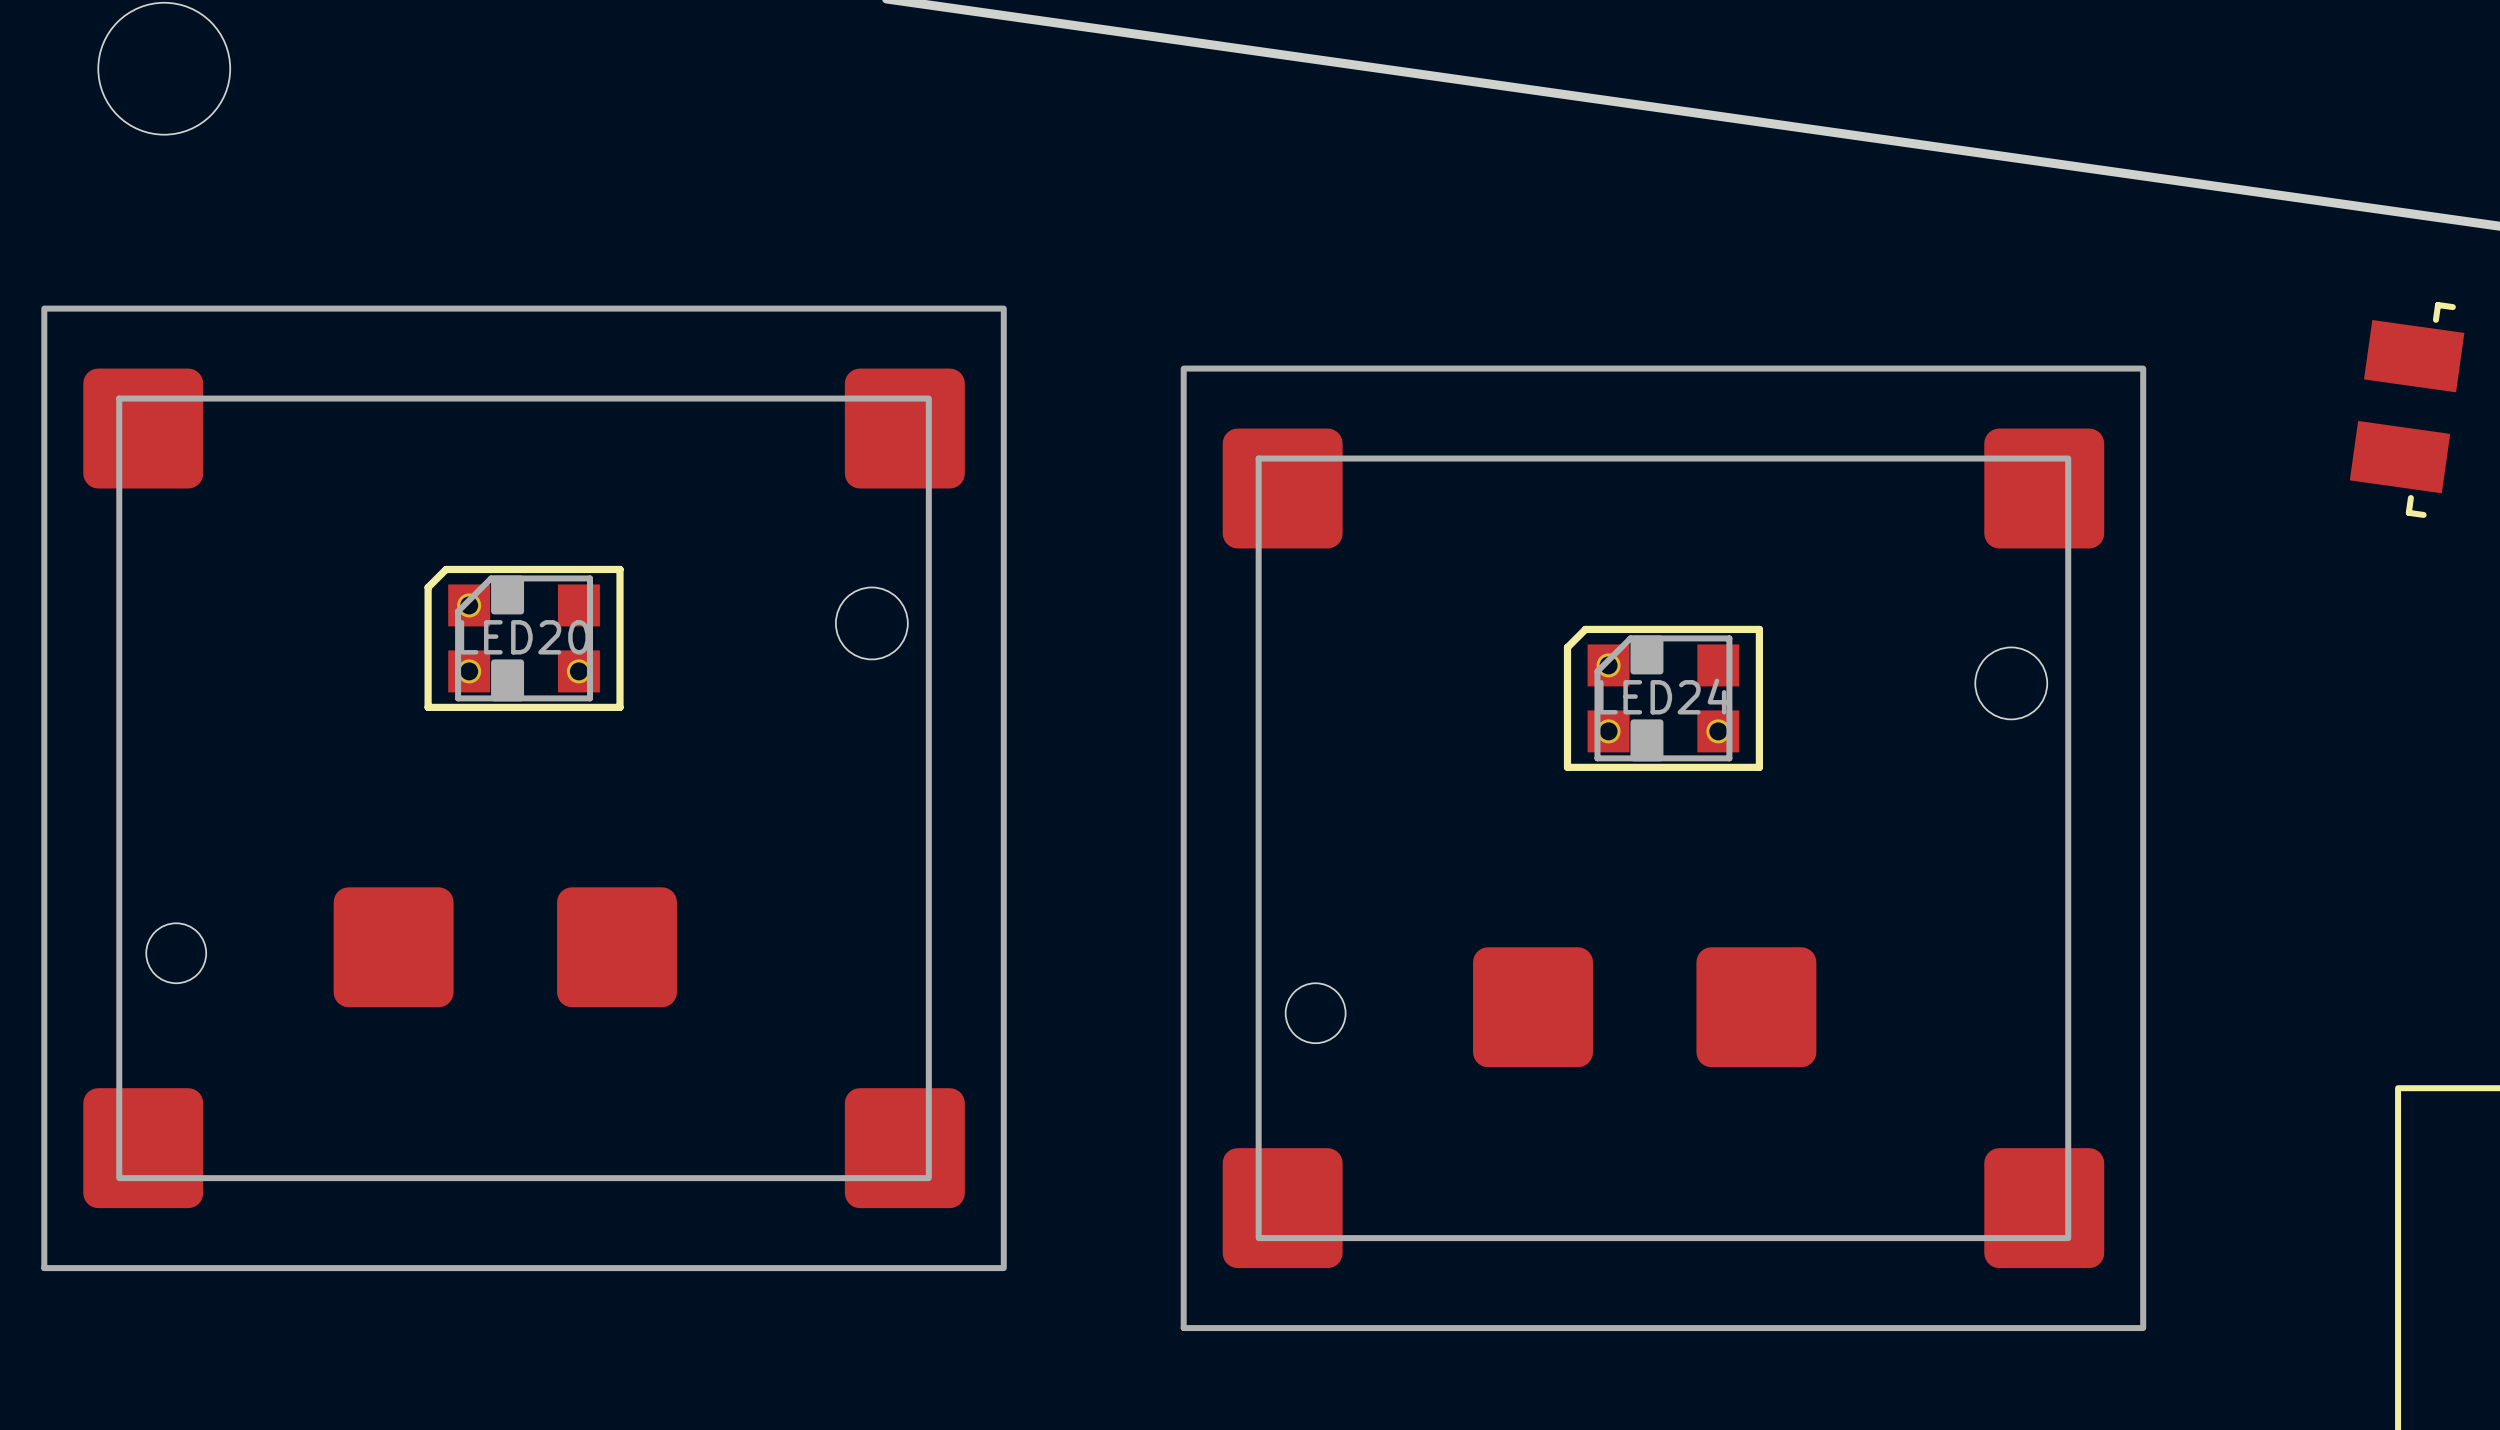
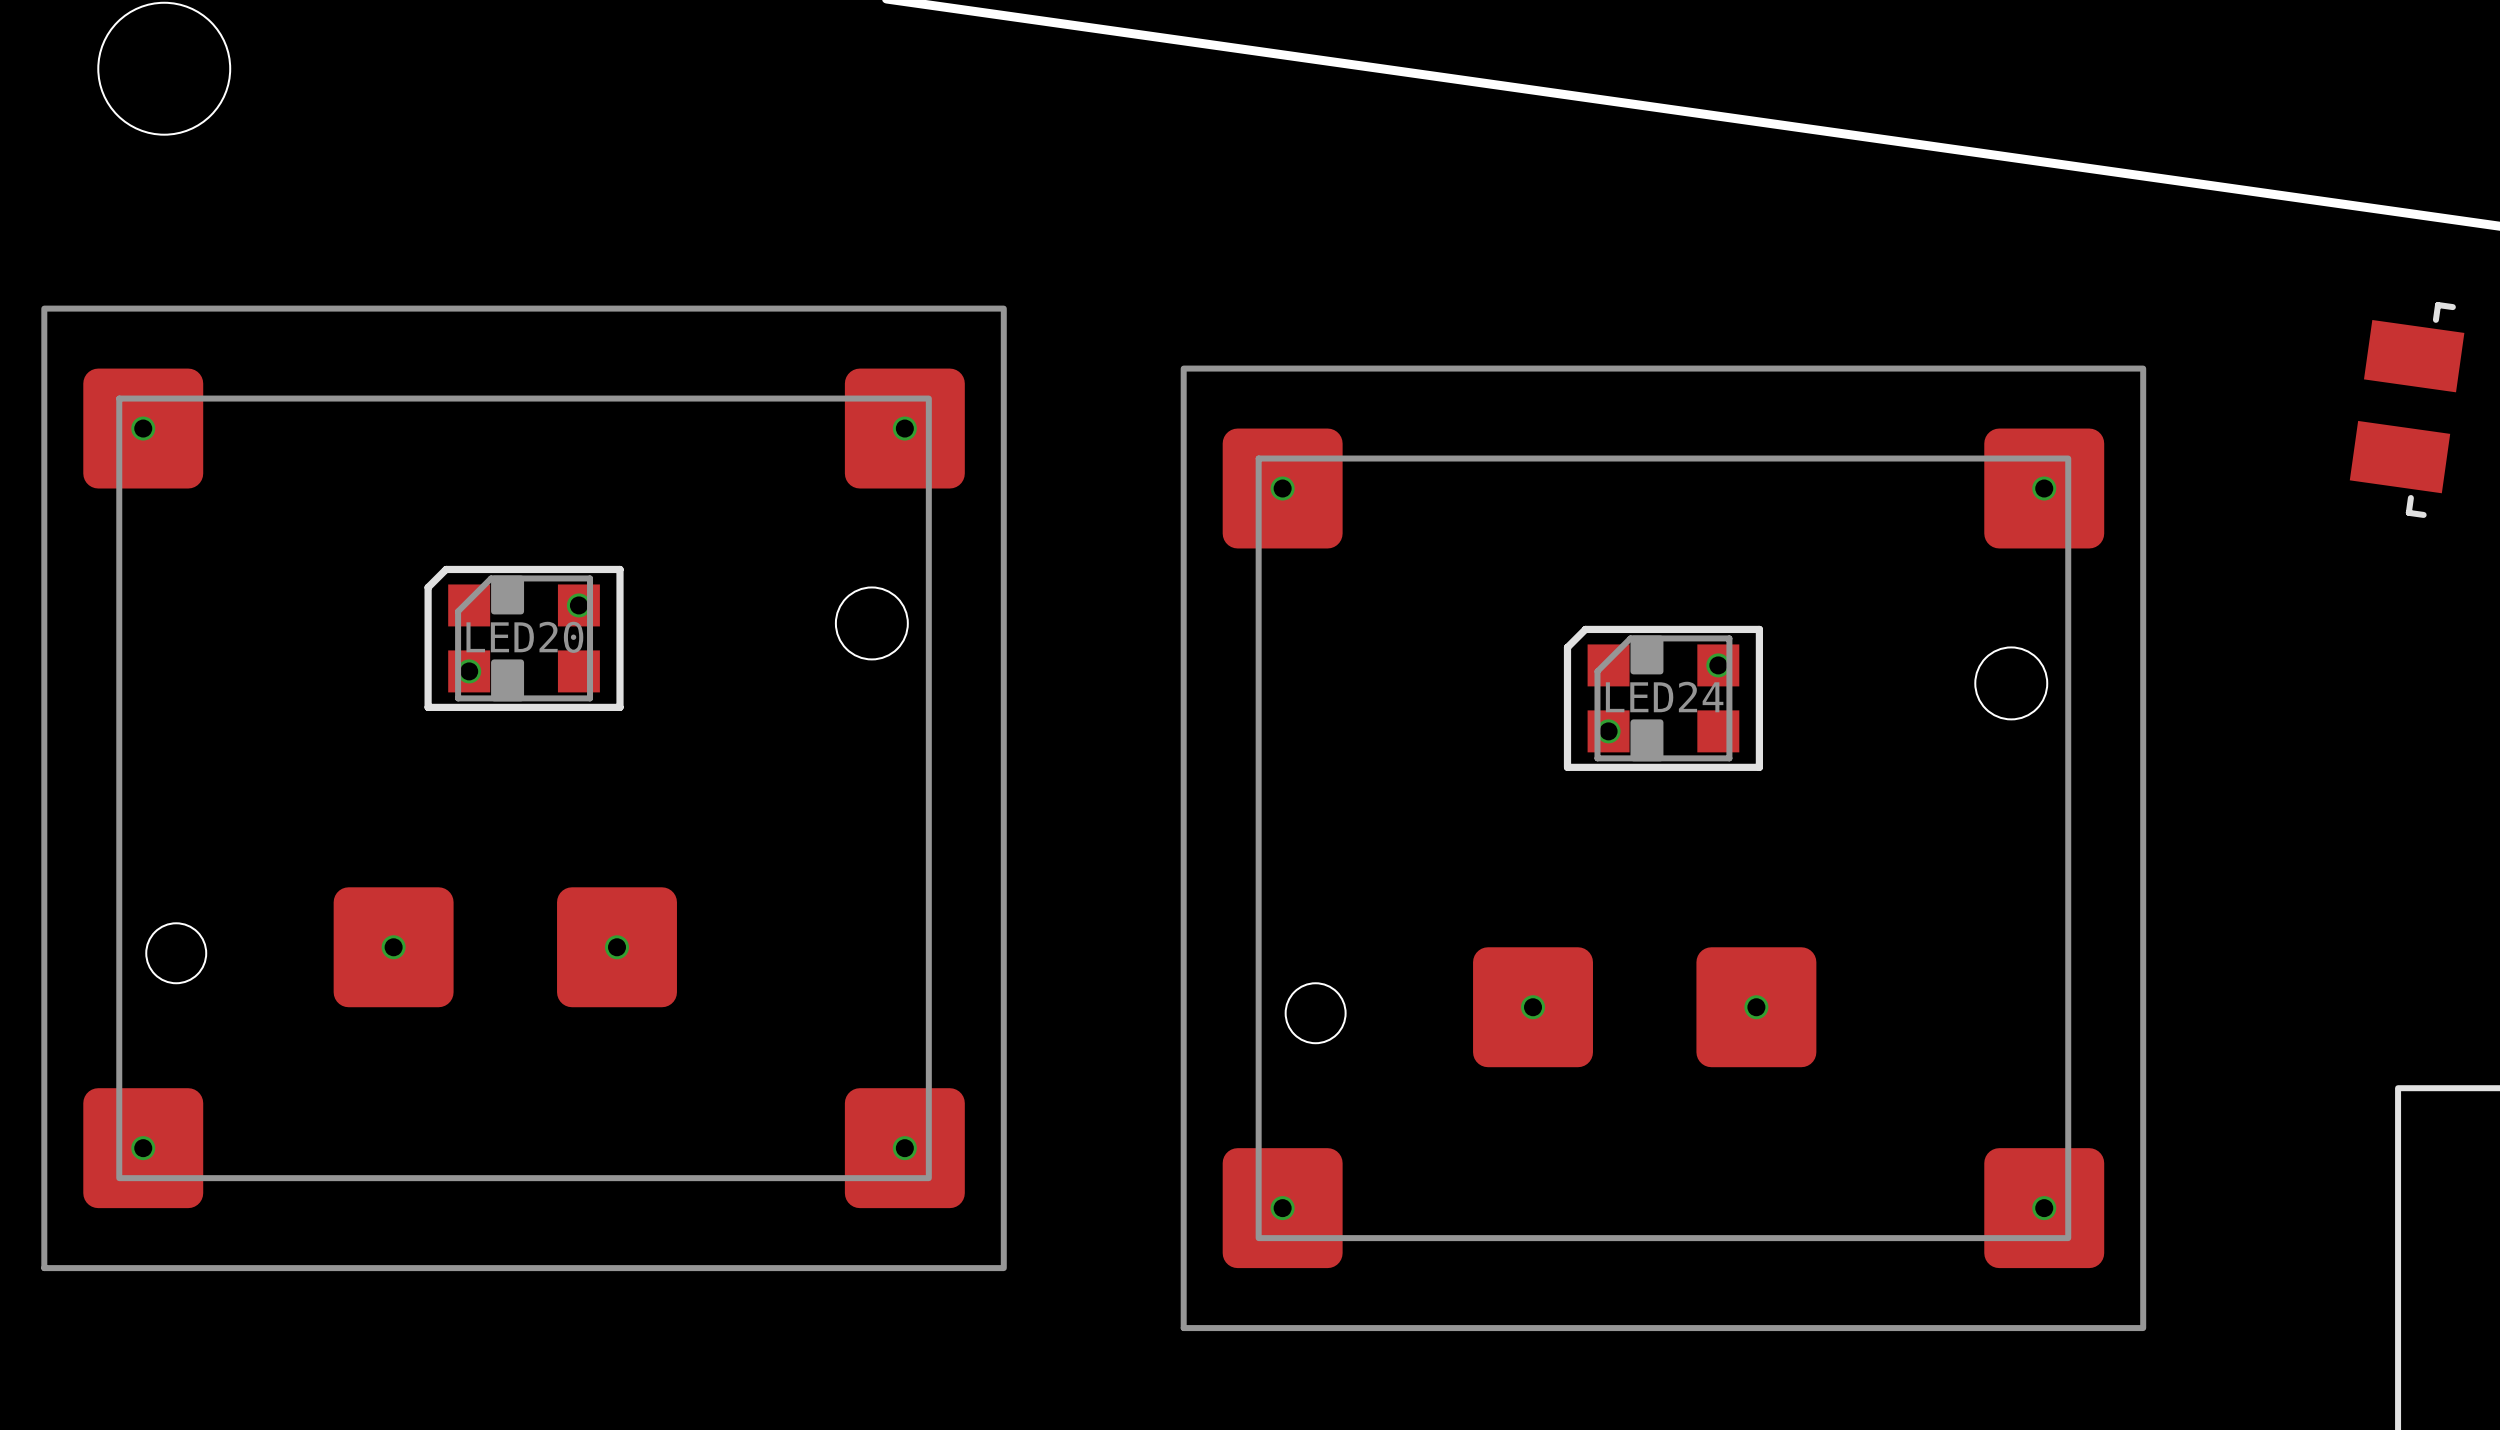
part footprint: [41, 305, 1007, 1272] -> [41, 305, 1007, 1272]
part footprint: [1180, 365, 2147, 1332] -> [1180, 365, 2147, 1332]
LED20 footprint: [424, 565, 624, 711] -> [424, 565, 624, 711]
LED24 footprint: [1563, 625, 1763, 771] -> [1563, 625, 1763, 771]

